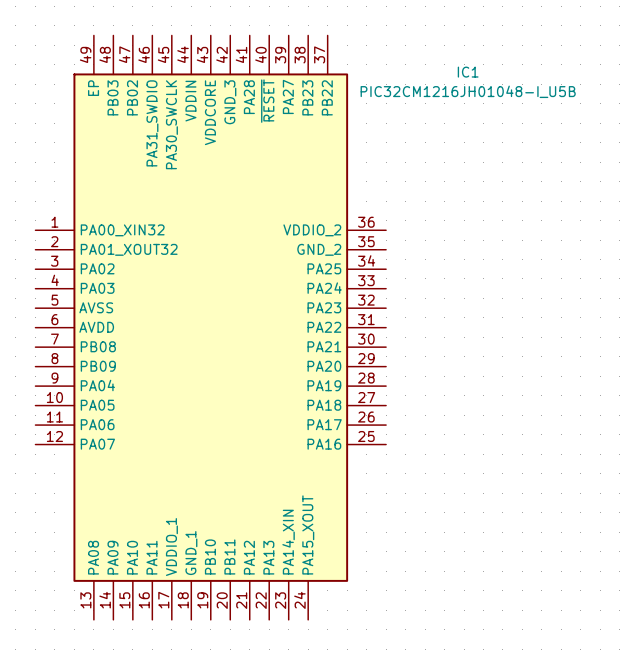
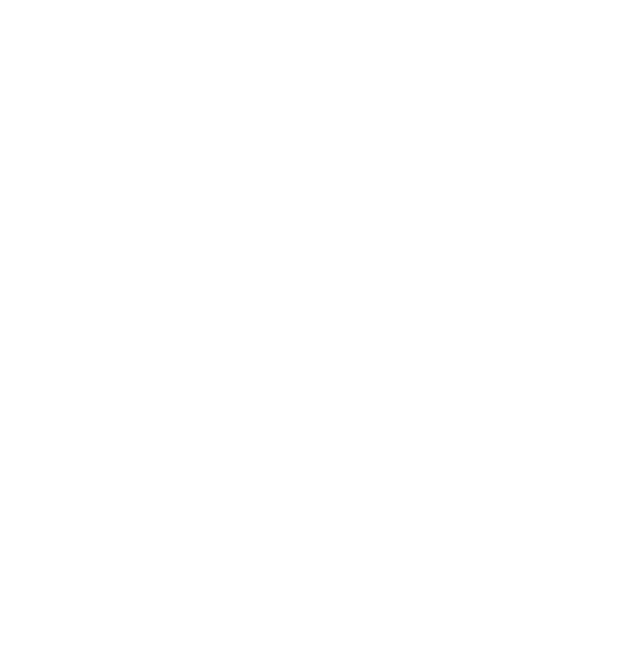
IC1: PIC32CM1216JH01048-I_U5B (210, 327) -> none

